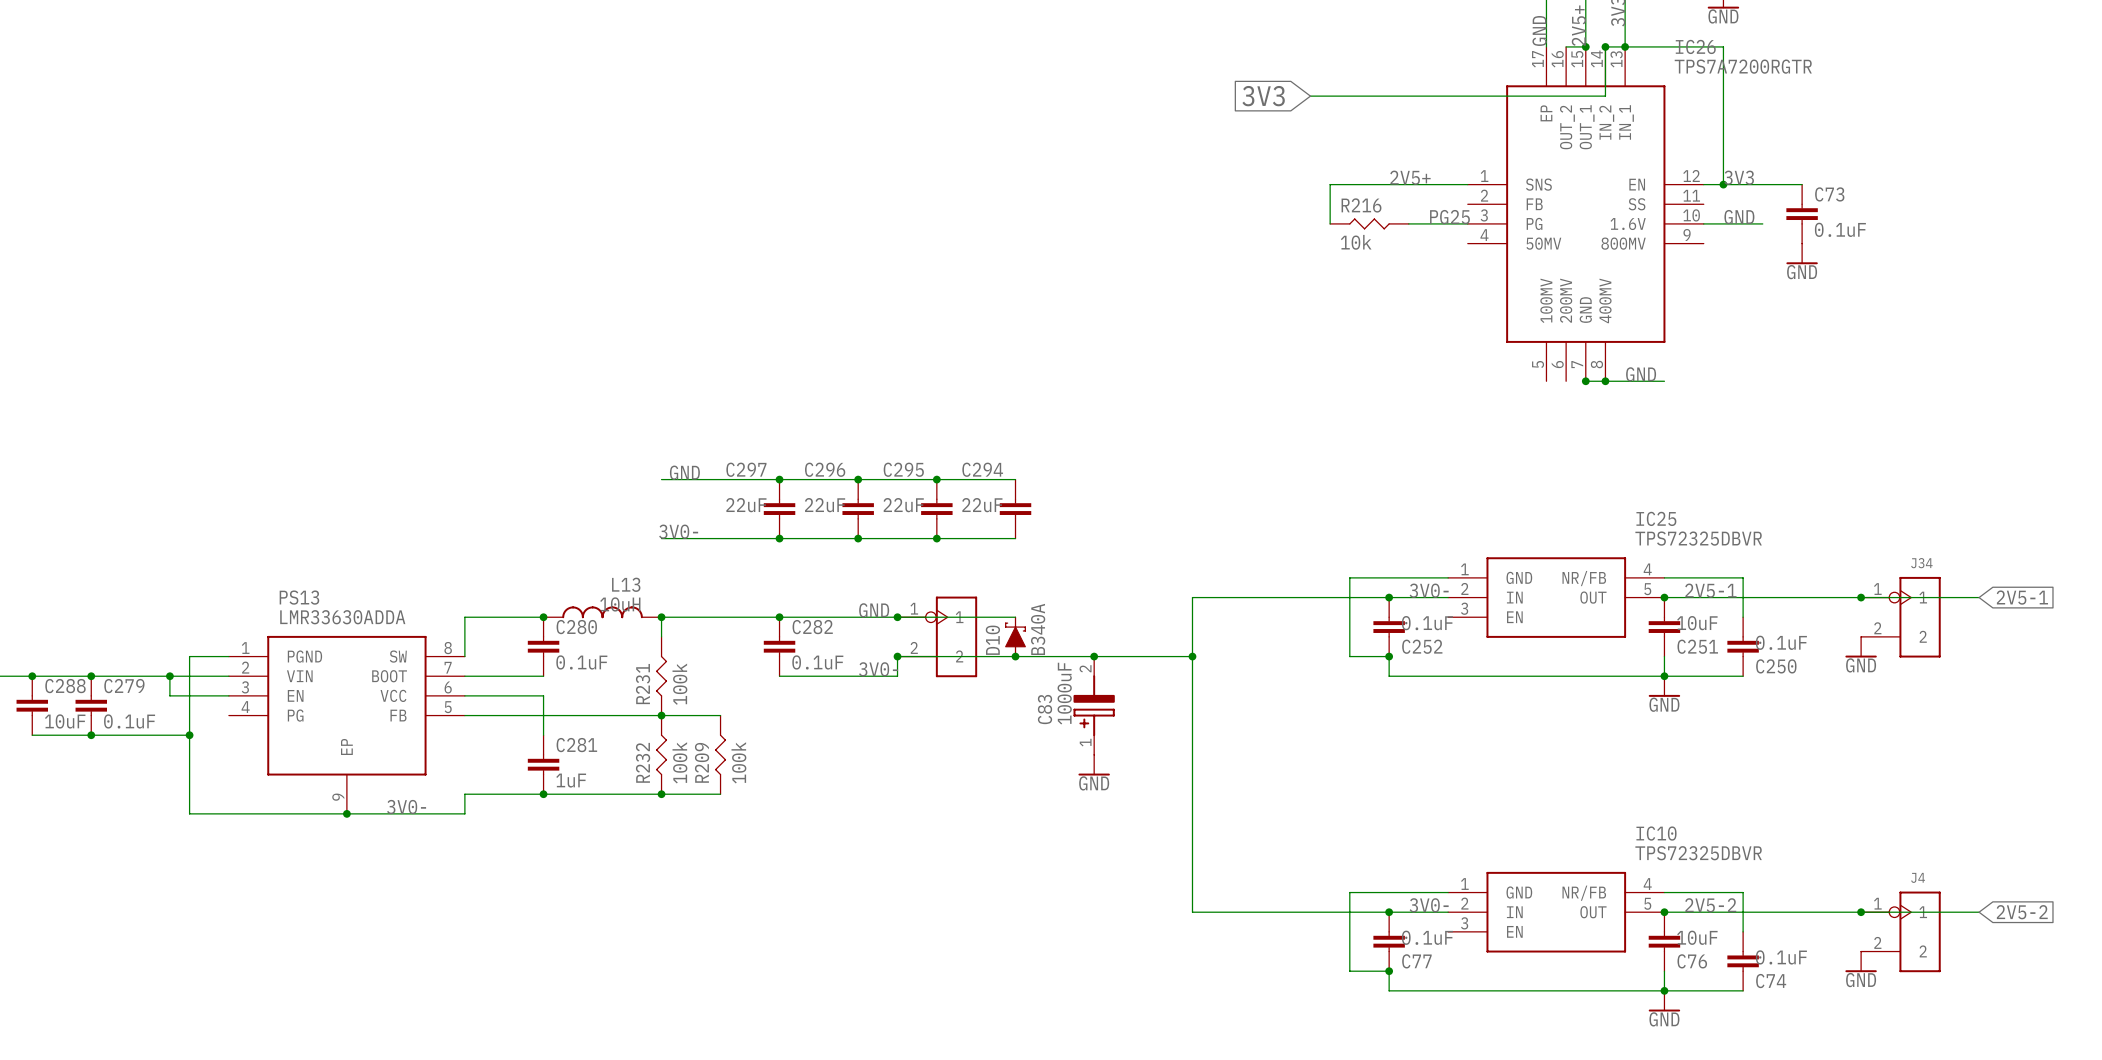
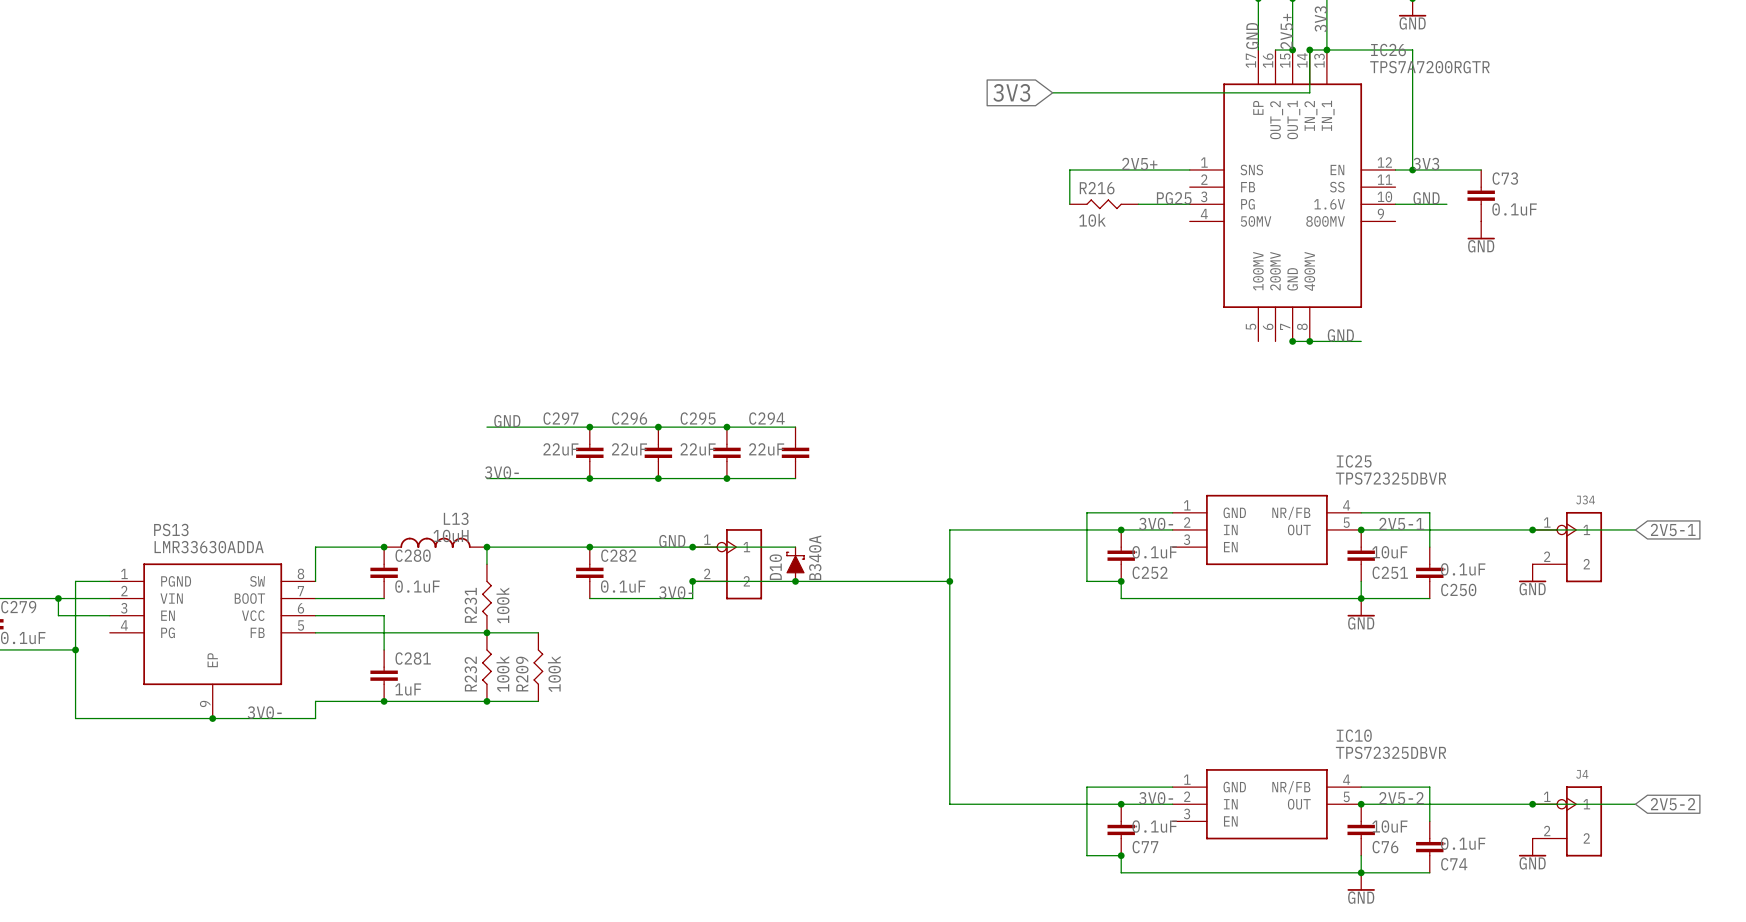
junction: (1094, 656) -> none
C83: 1000uF (1094, 705) -> none
power symbol: GND (1094, 765) -> none

